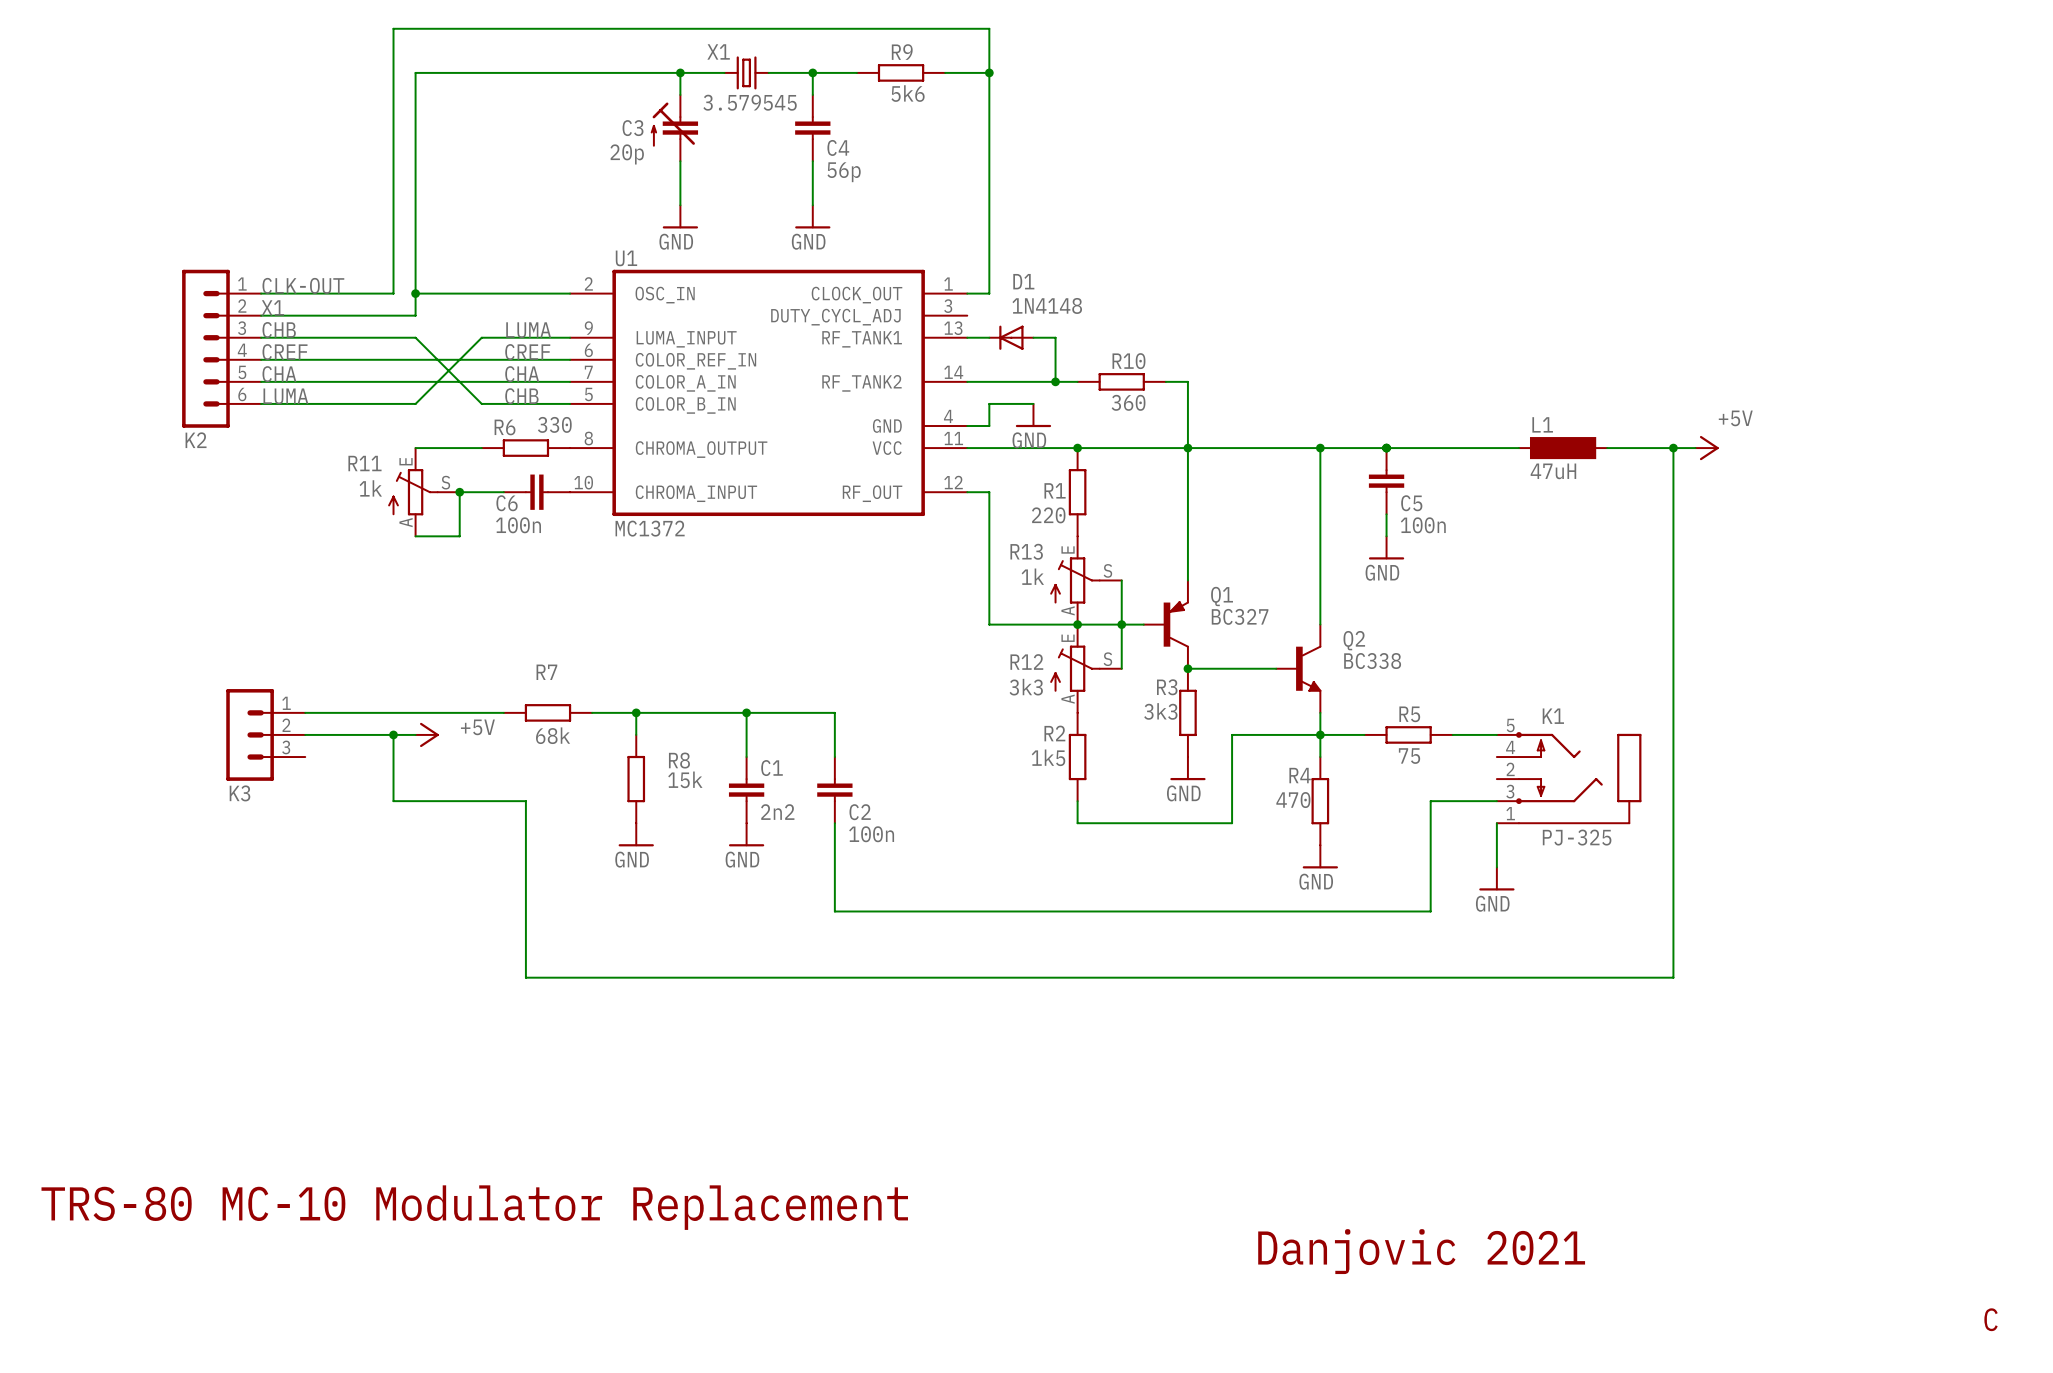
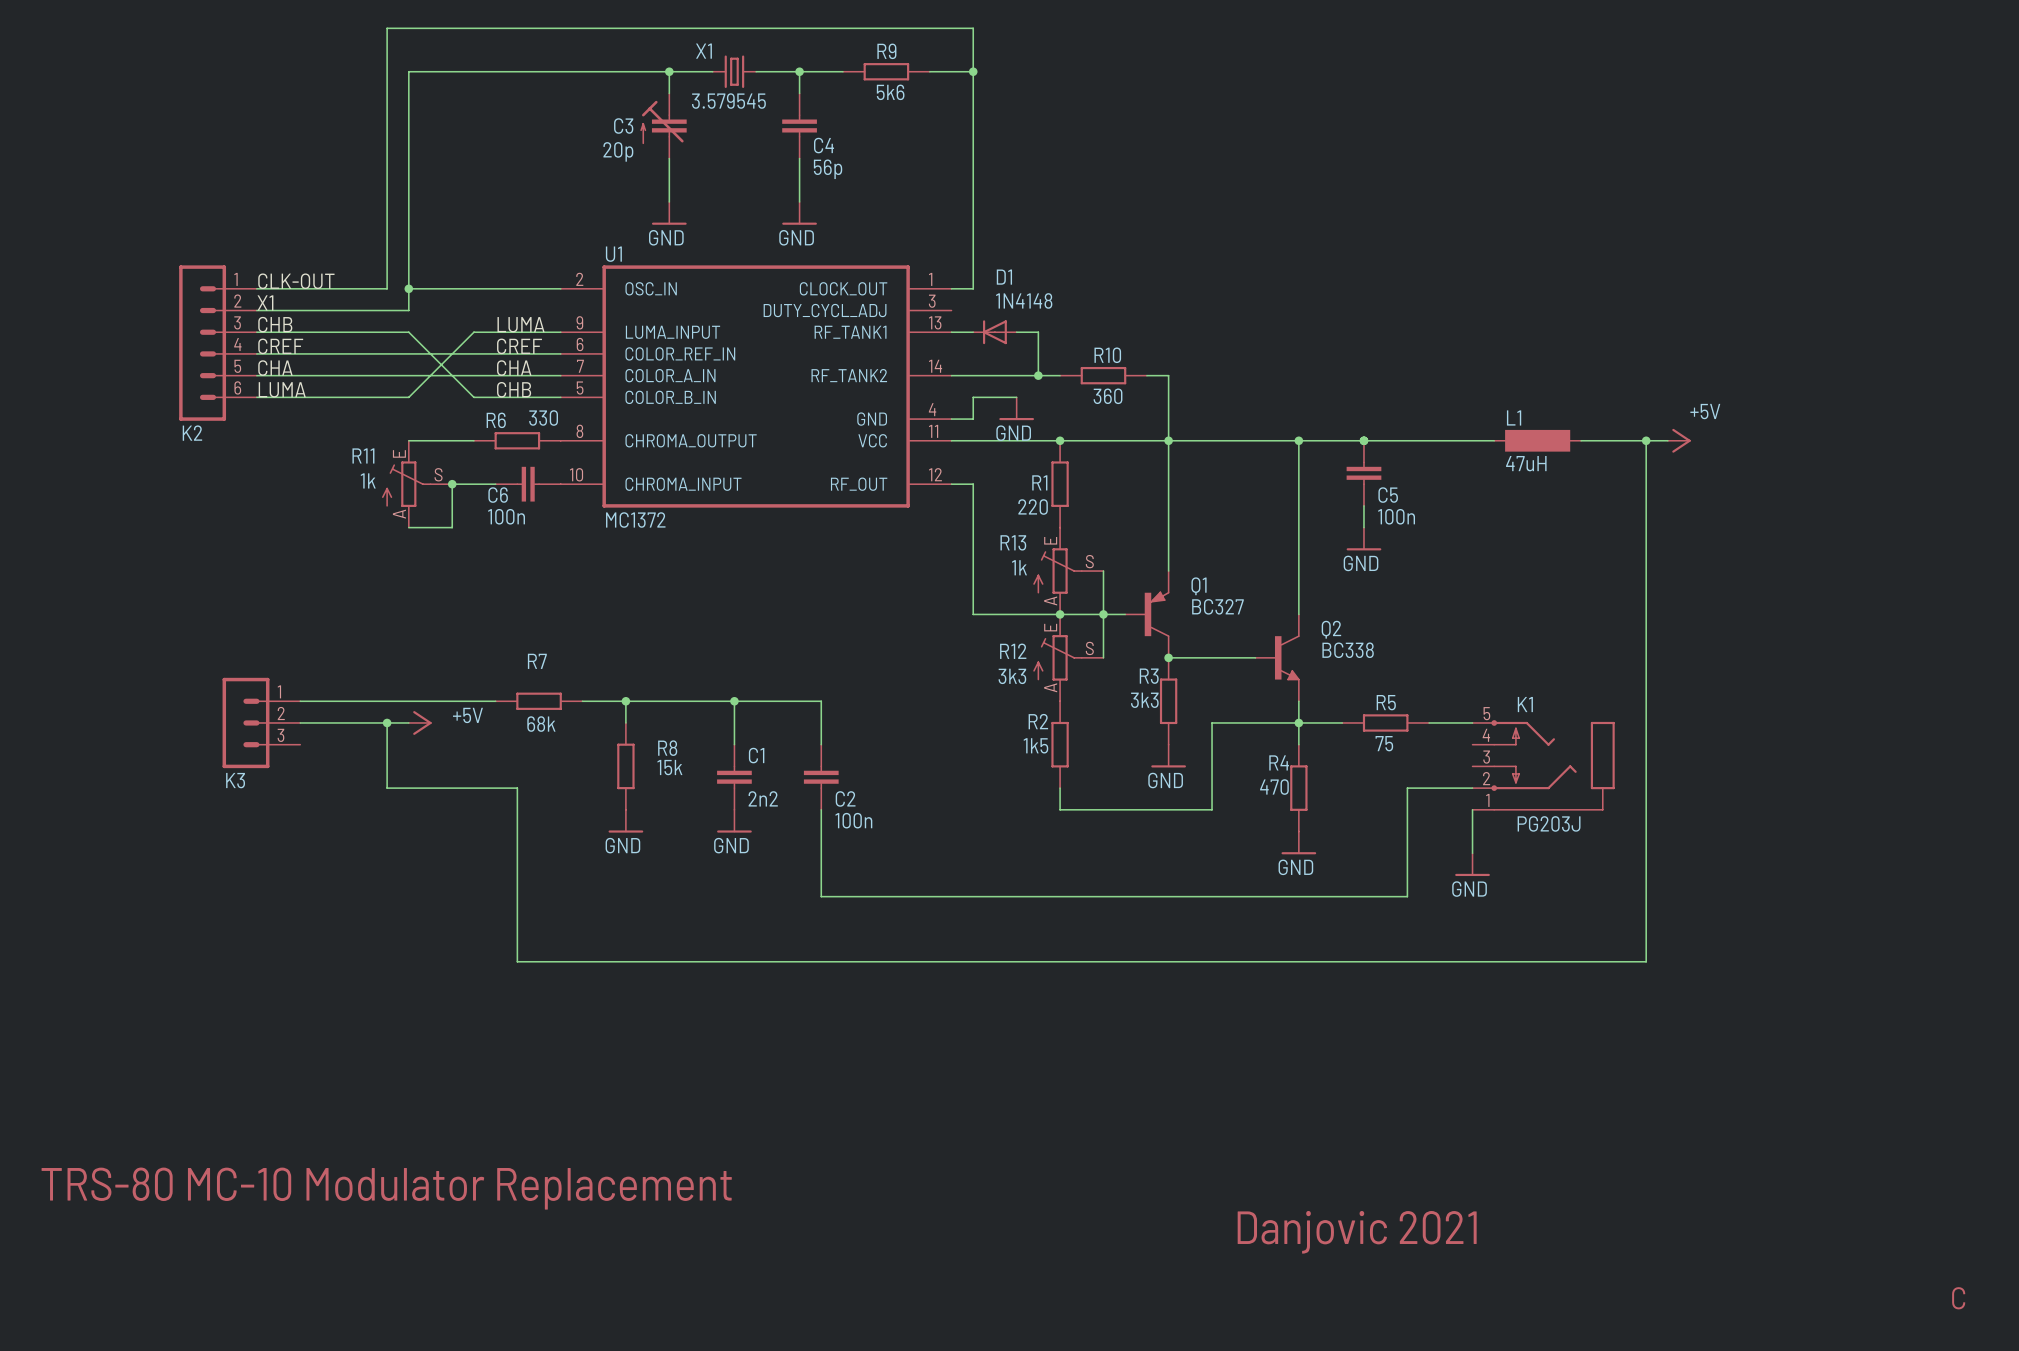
K1 pin number: 2 (1510, 769) -> 3 (1486, 757)
K1 pin number: 3 (1510, 791) -> 2 (1486, 778)
K1 value: PJ-325 (1577, 837) -> PG203J (1549, 823)

